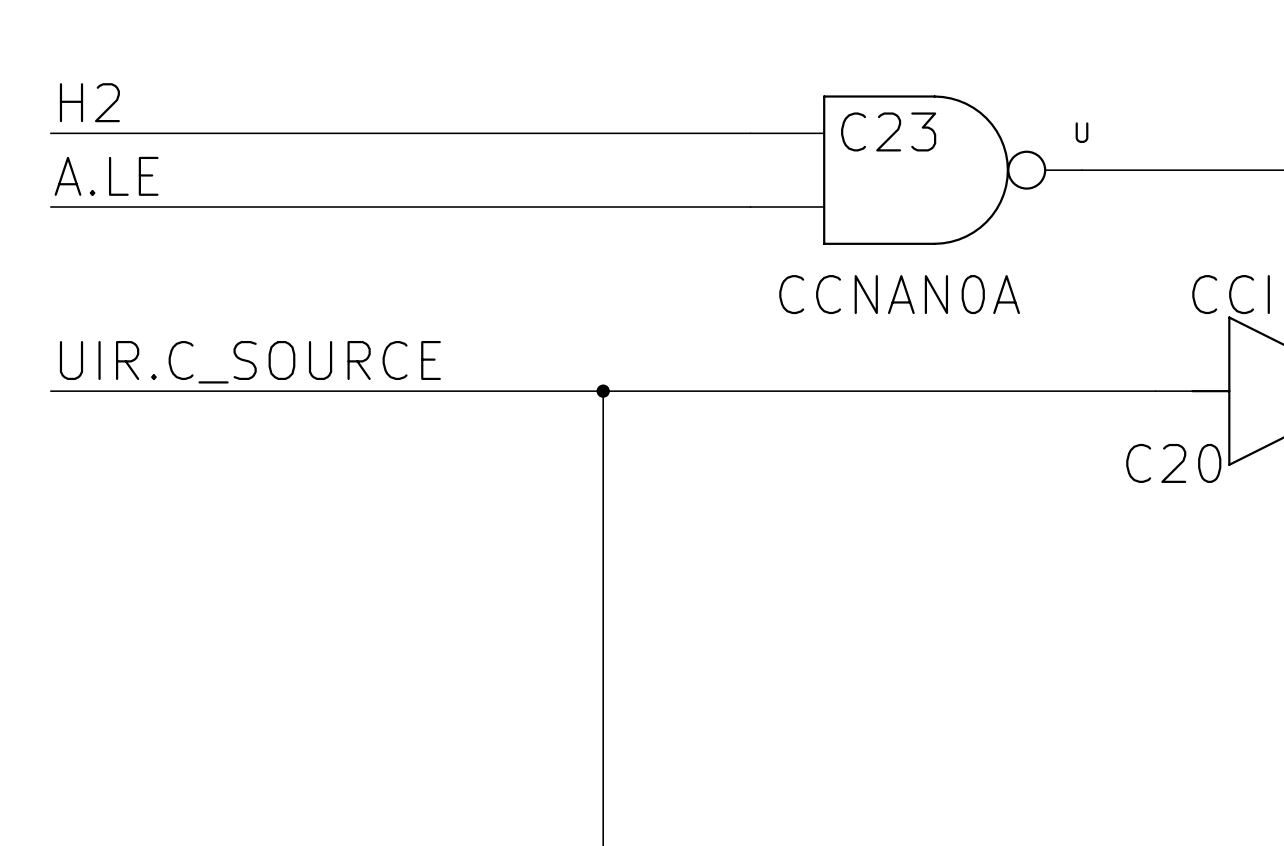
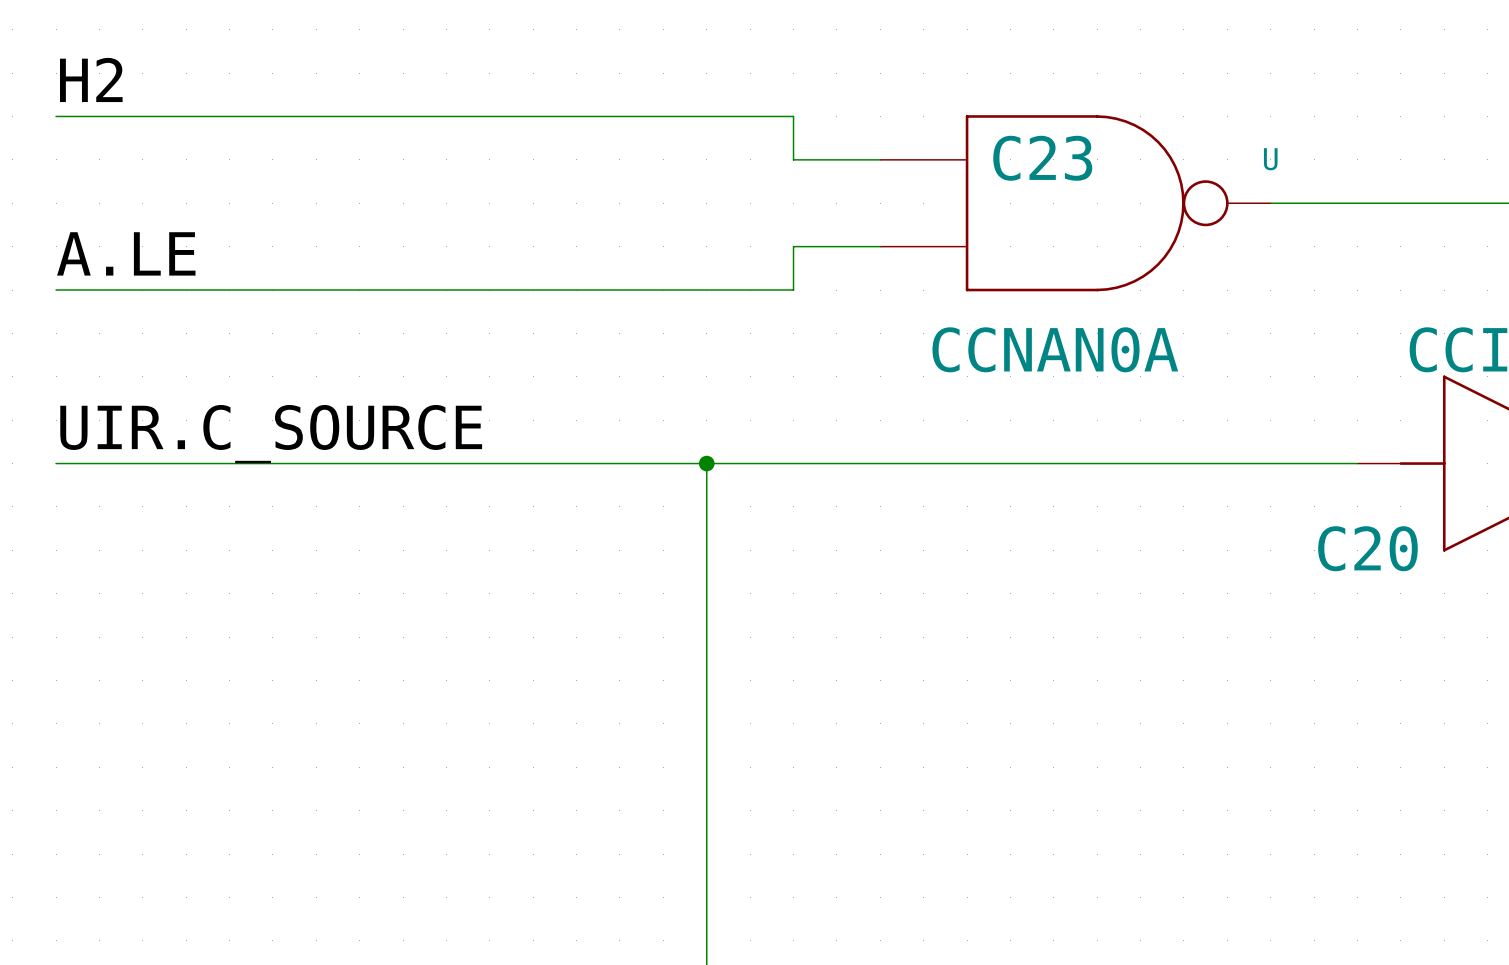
label position: H2 (89, 102) -> H2 (91, 79)
wire: (50, 133) (676, 133) -> (56, 116) (793, 116) (793, 159)
label position: A.LE (106, 176) -> A.LE (126, 253)
wire: (50, 207) (676, 207) -> (56, 290) (793, 290) (793, 246)

